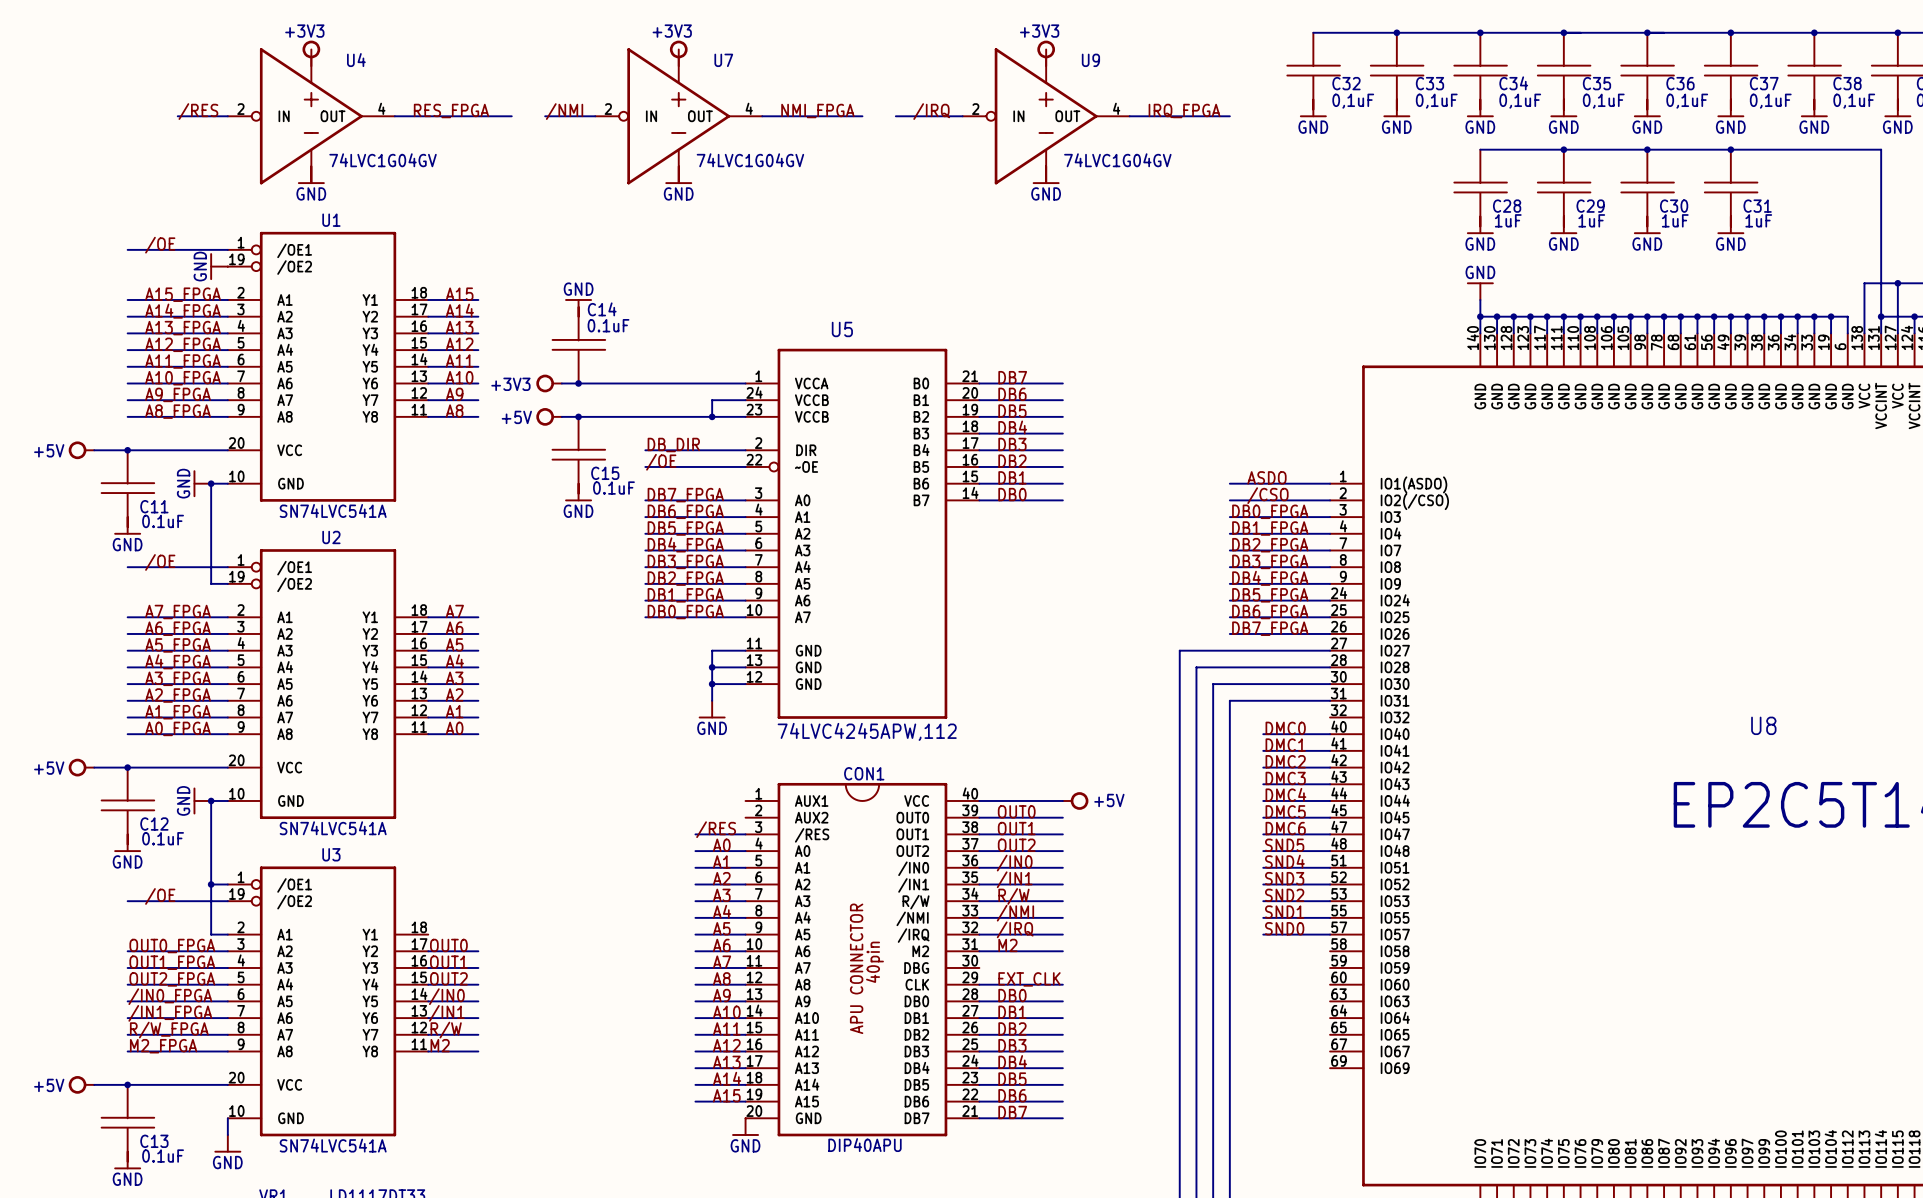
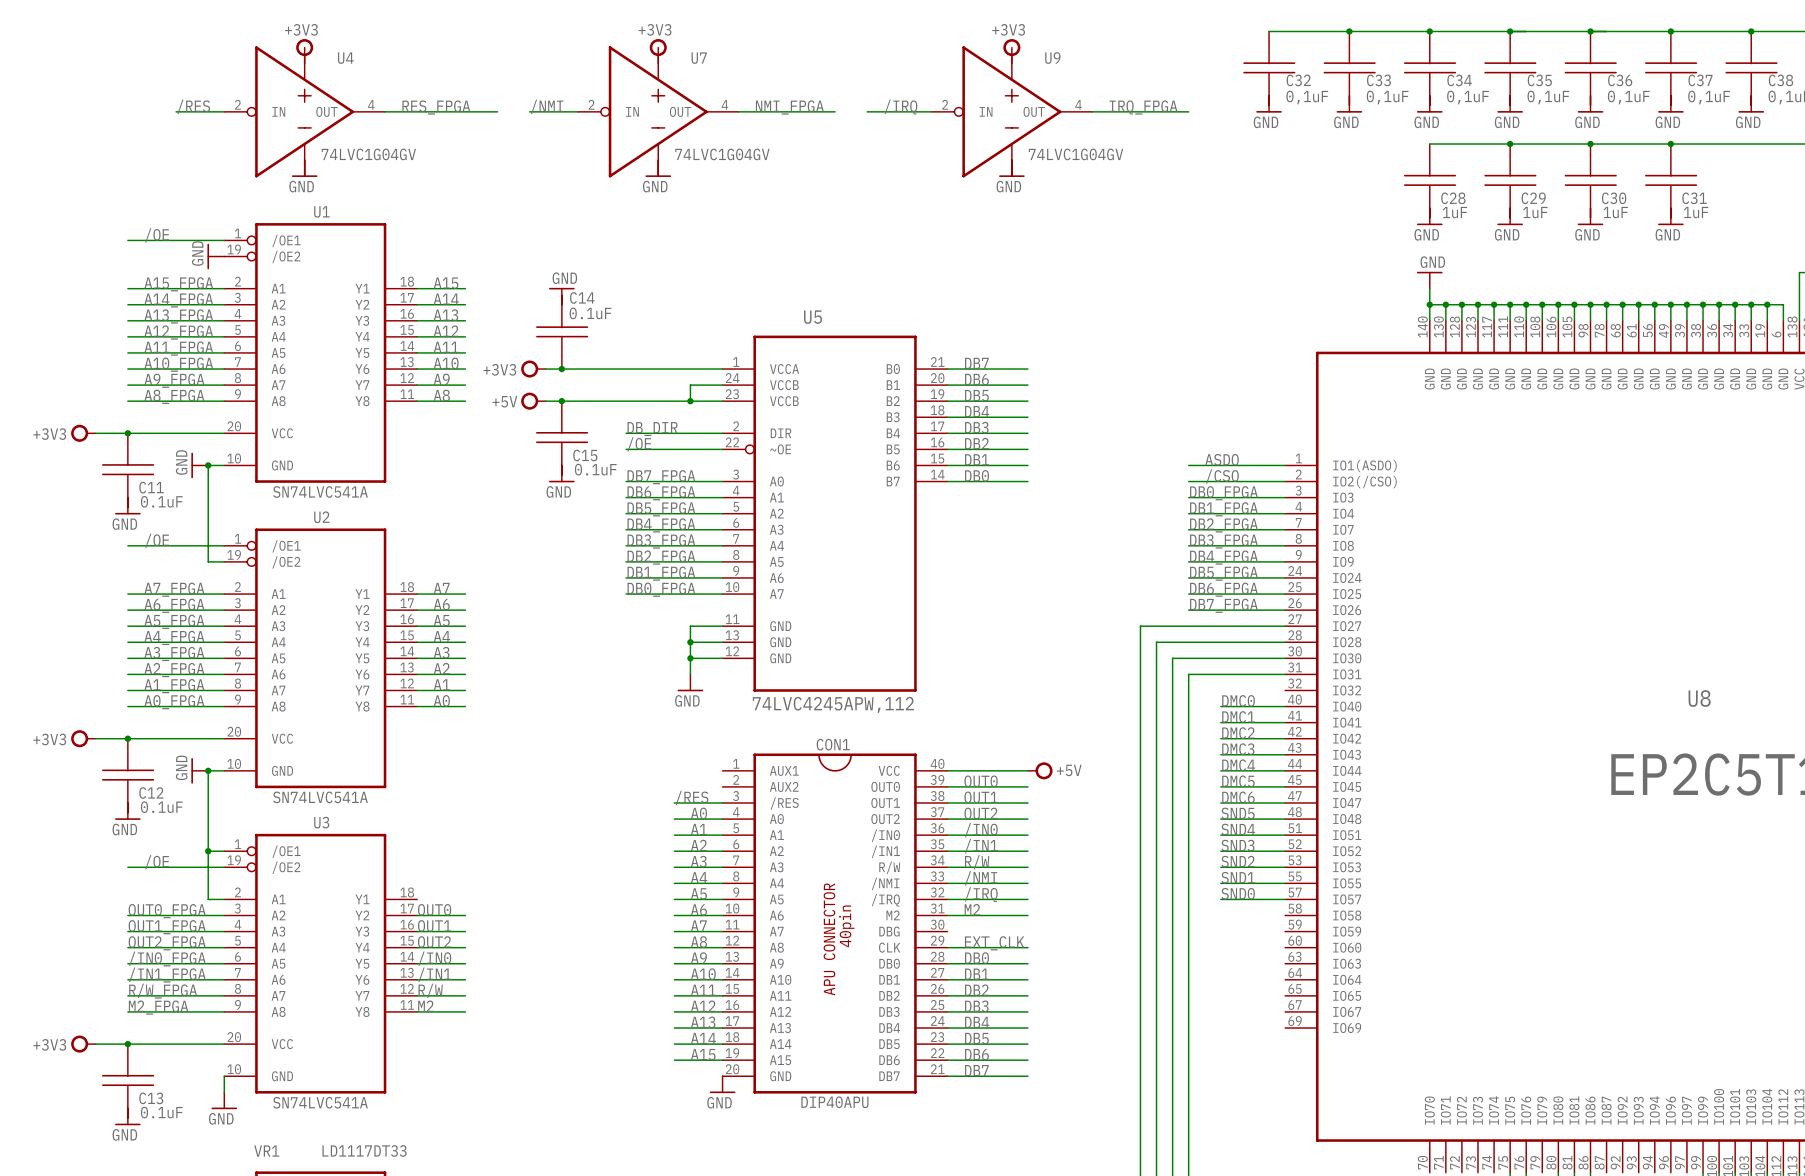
power symbol: +5V (81, 450) -> +3V3 (83, 433)
power symbol: +5V (81, 767) -> +3V3 (83, 738)
power symbol: +5V (81, 1084) -> +3V3 (83, 1044)

